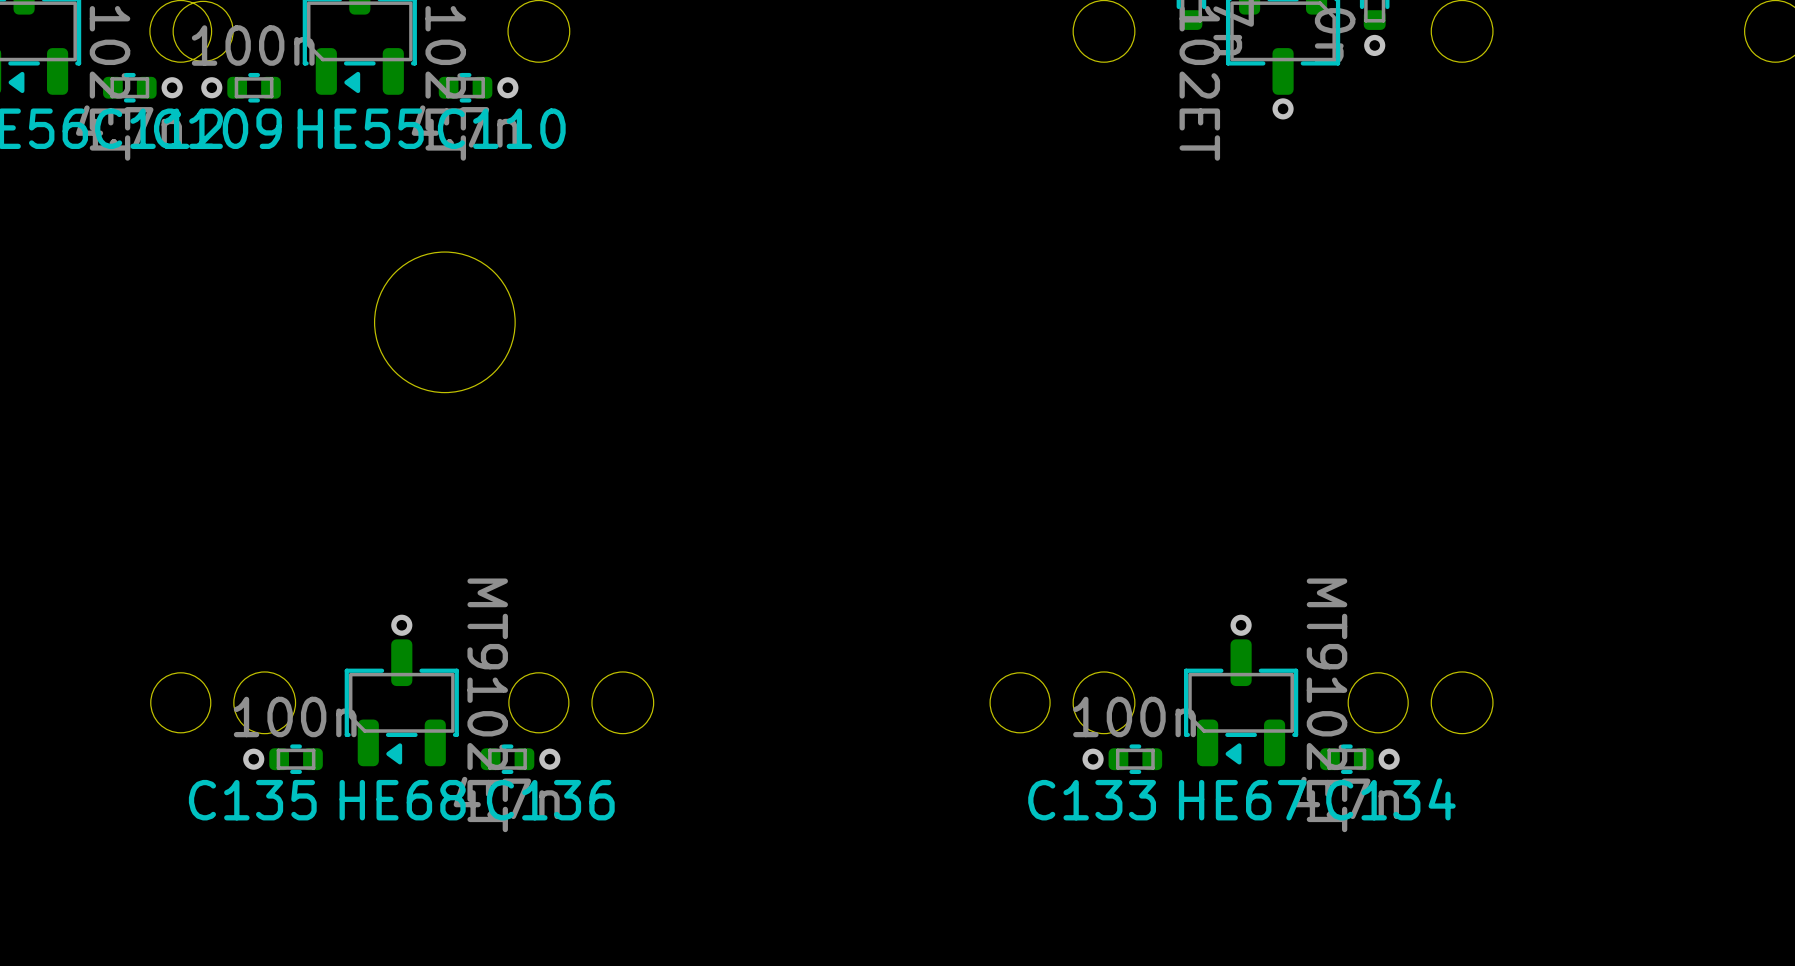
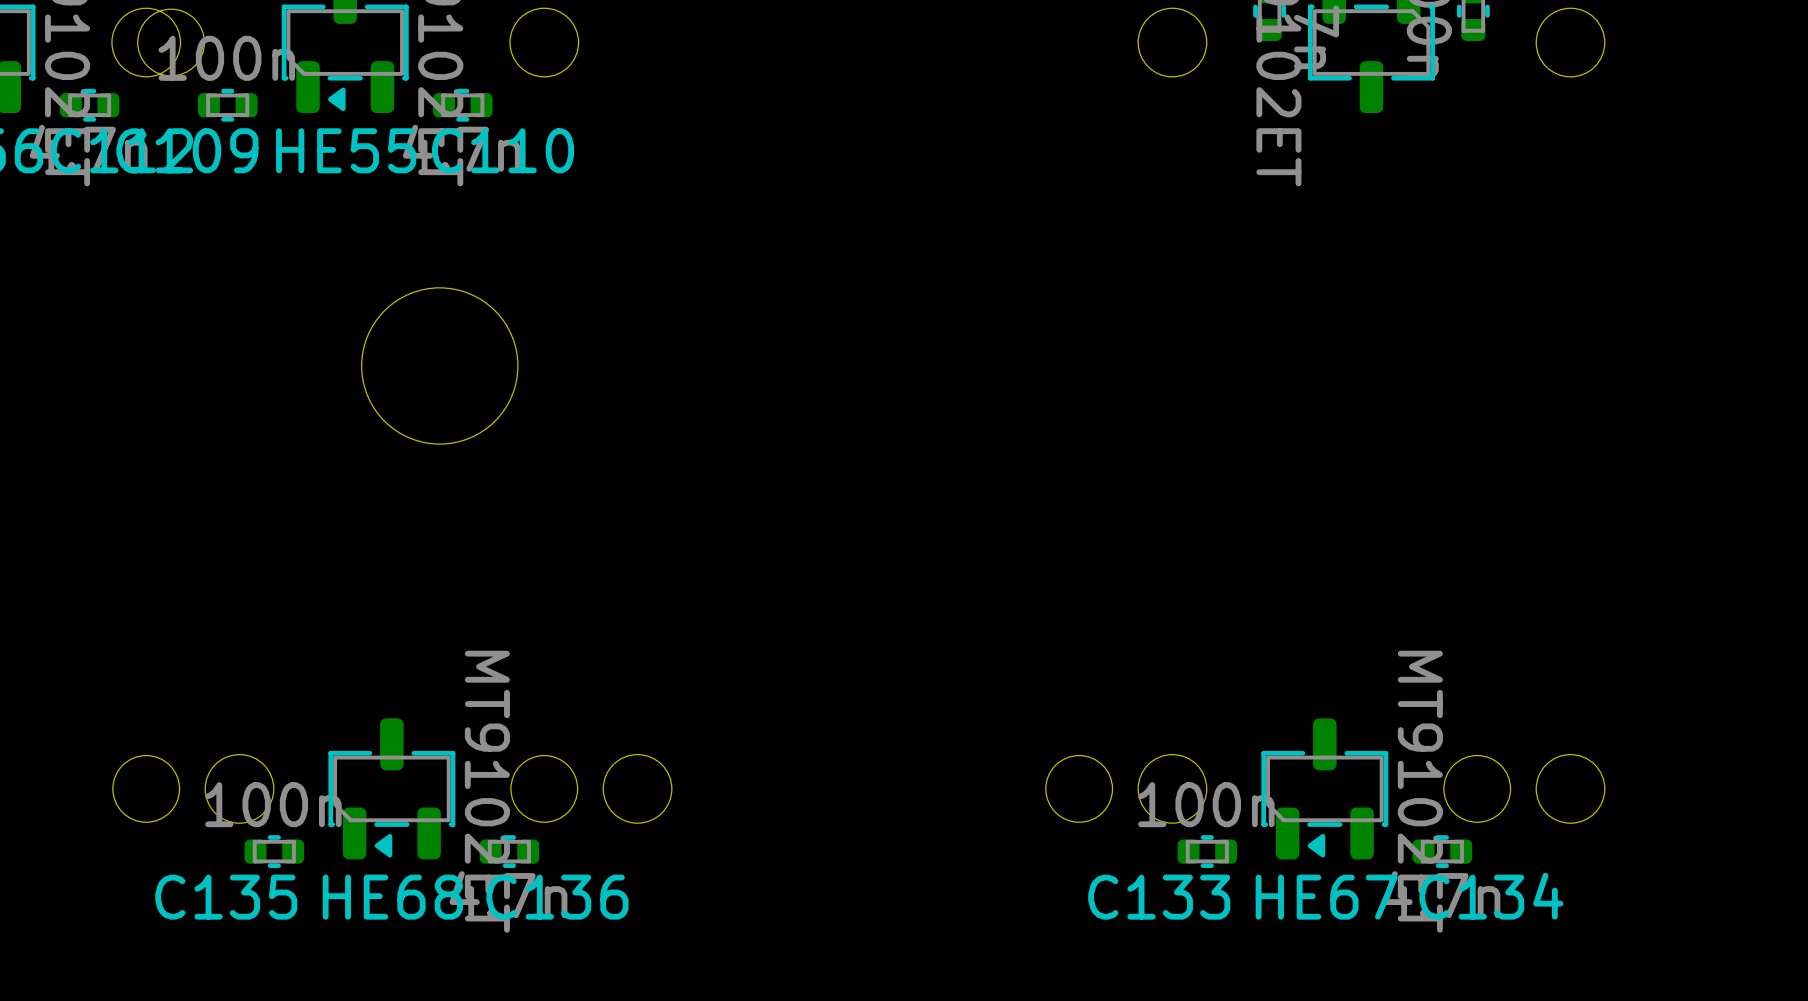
via: (1374, 45) -> none
via: (172, 87) -> none
via: (211, 87) -> none
via: (507, 87) -> none
via: (1283, 108) -> none
via: (401, 625) -> none
via: (1241, 625) -> none
via: (253, 759) -> none
via: (549, 759) -> none
via: (1093, 759) -> none
via: (1389, 759) -> none

